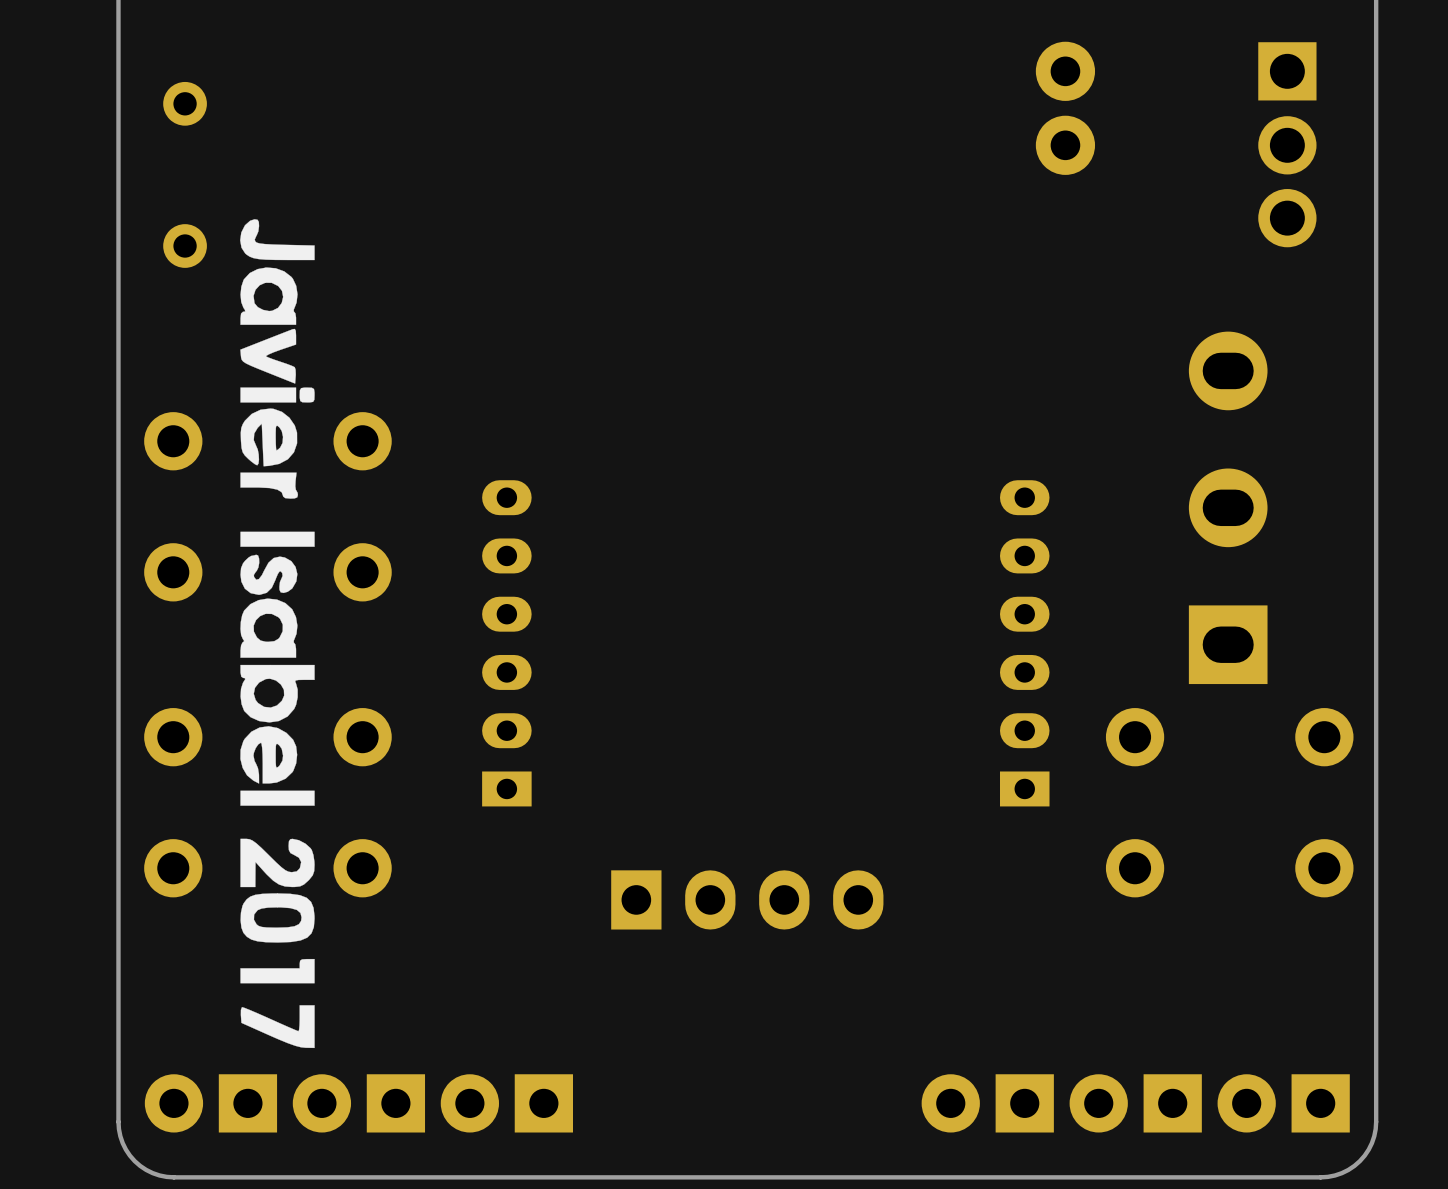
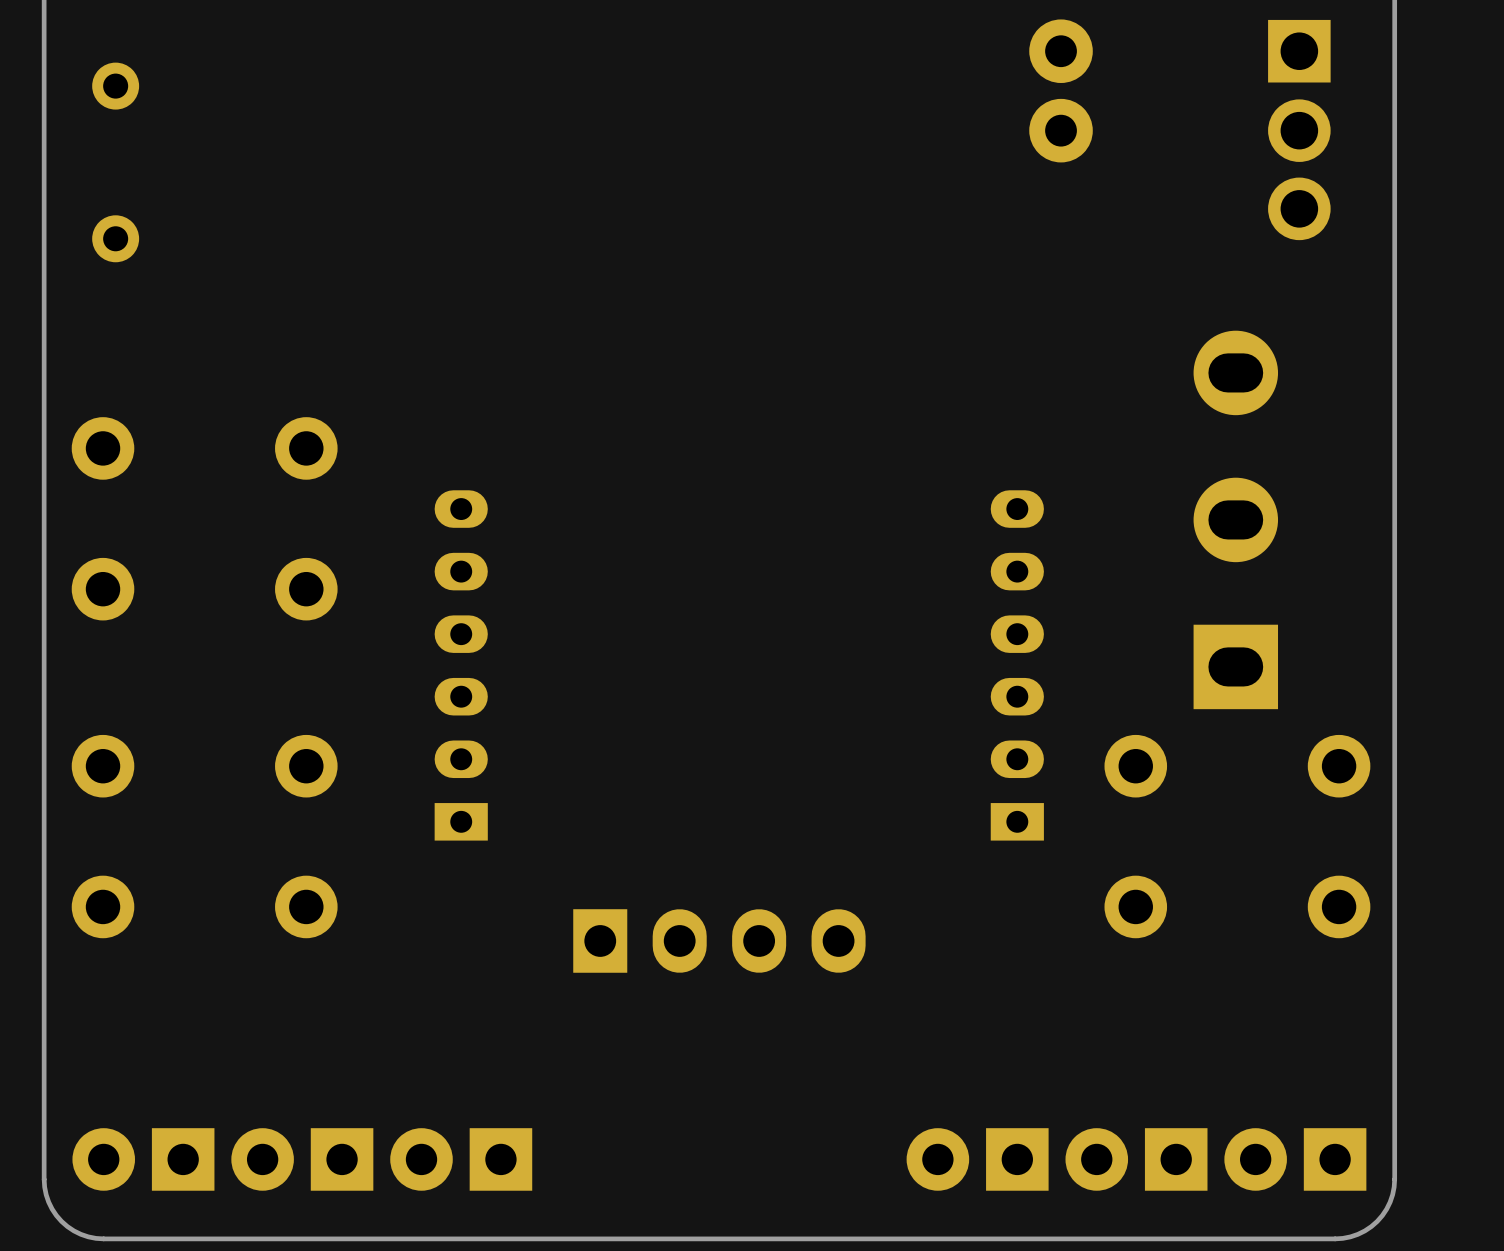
drawing: [240, 219, 315, 1049] -> none

